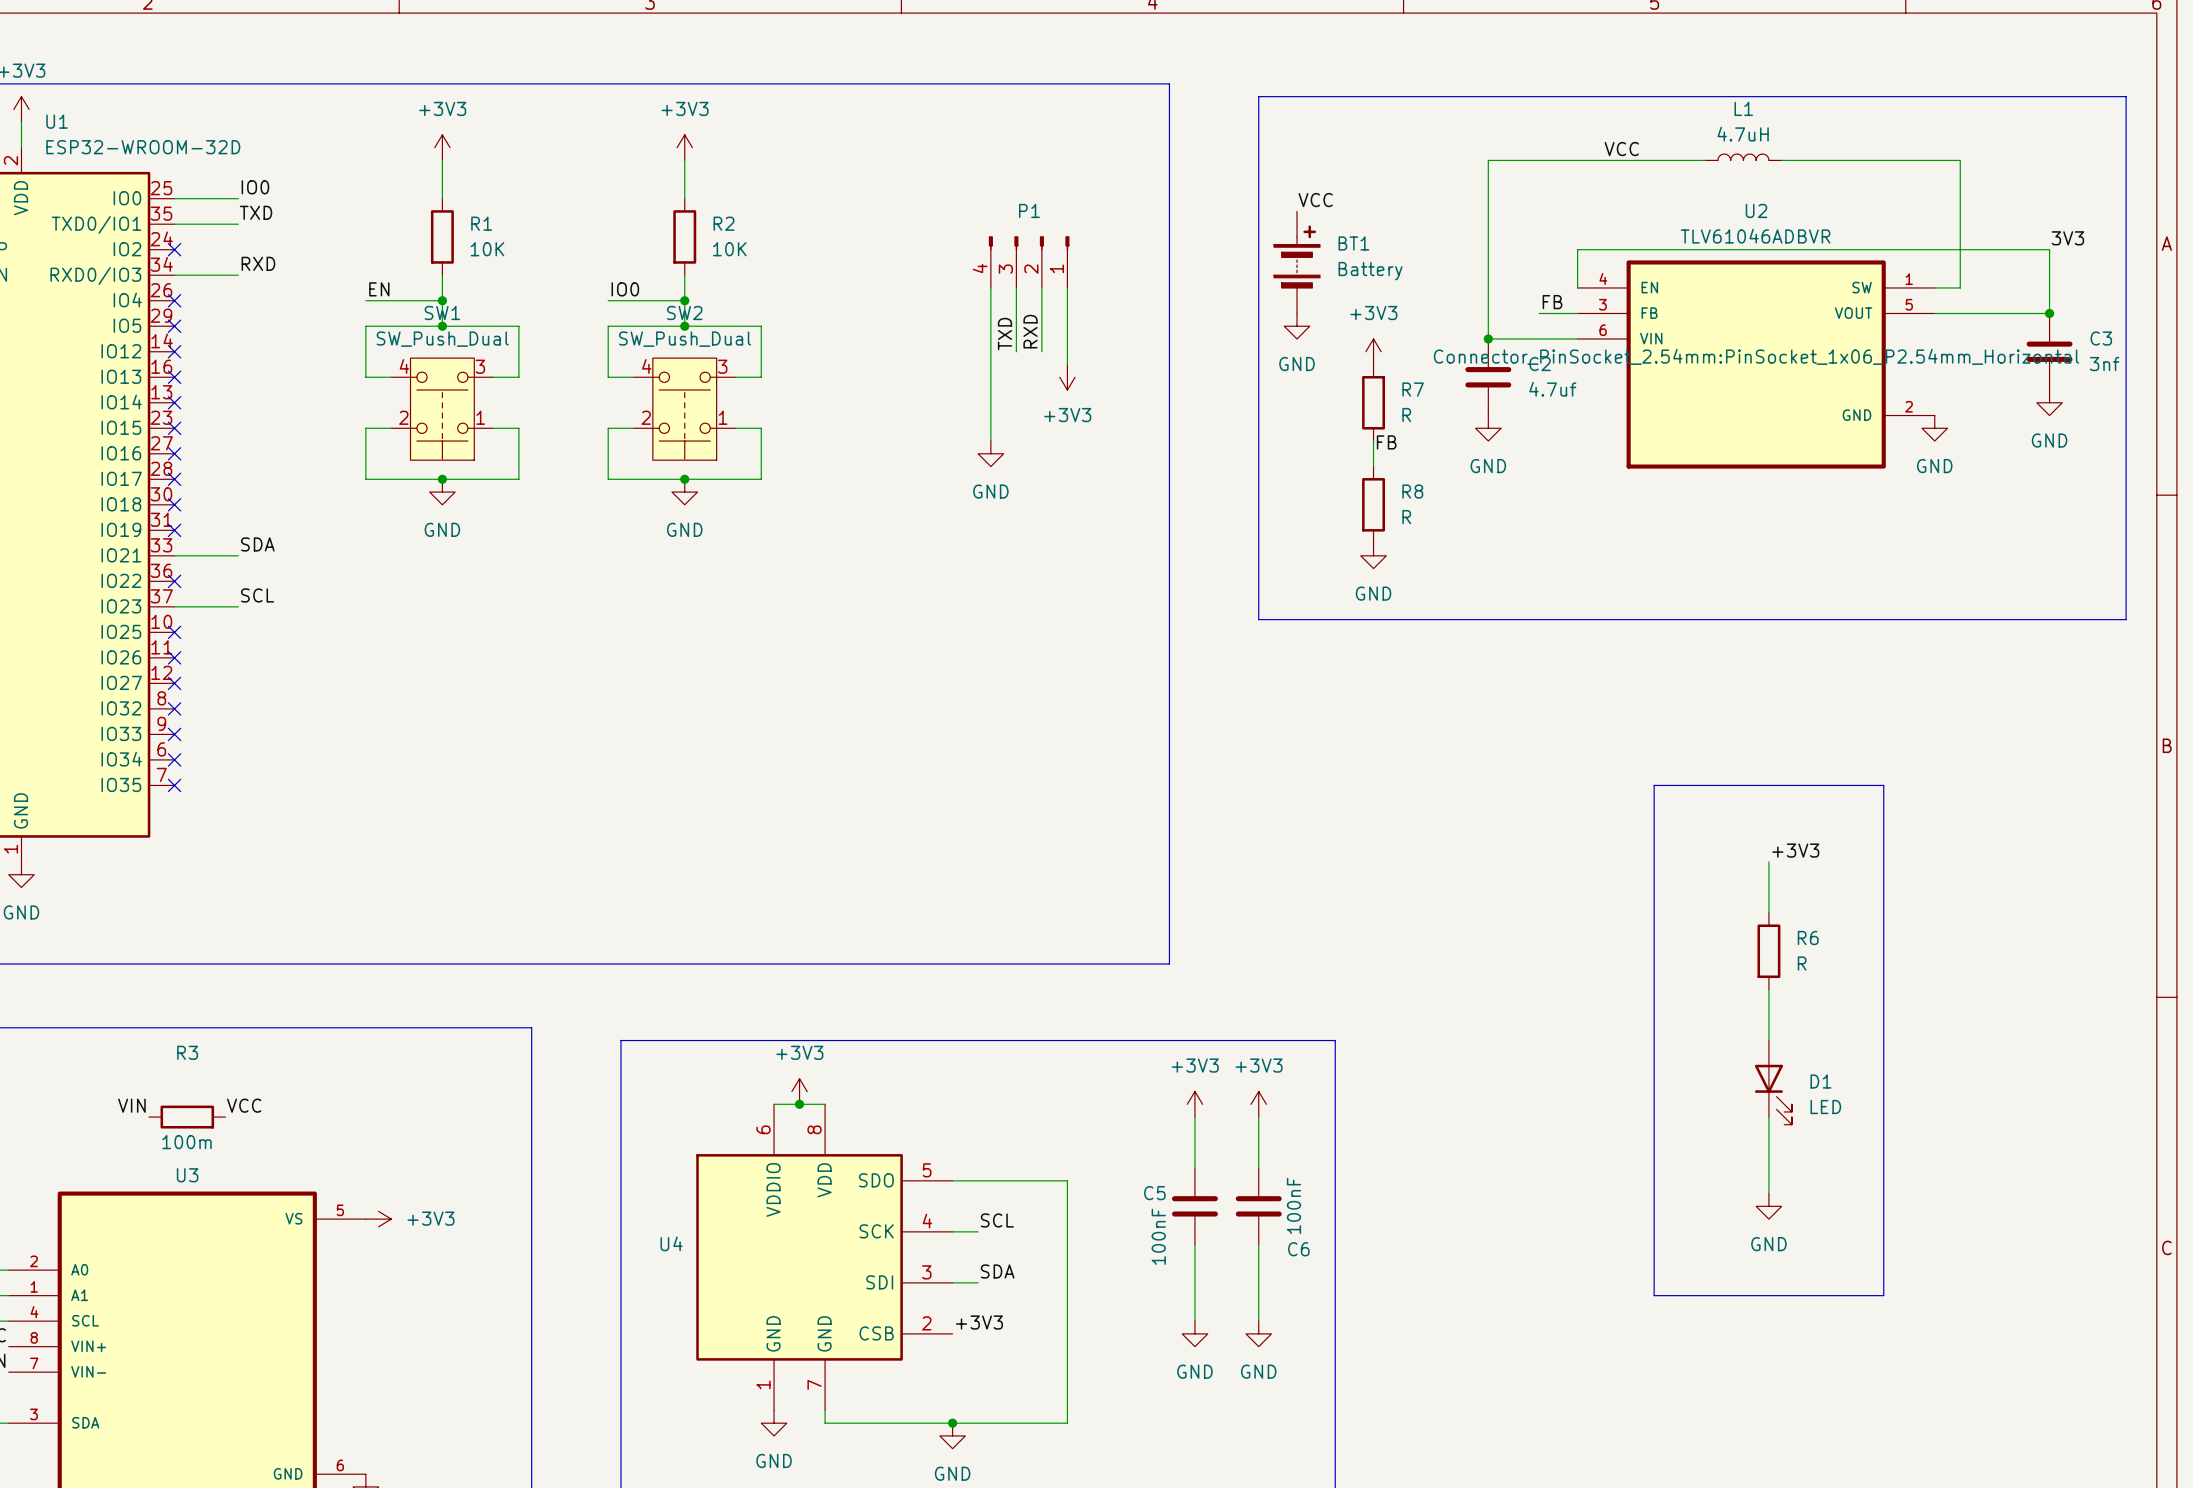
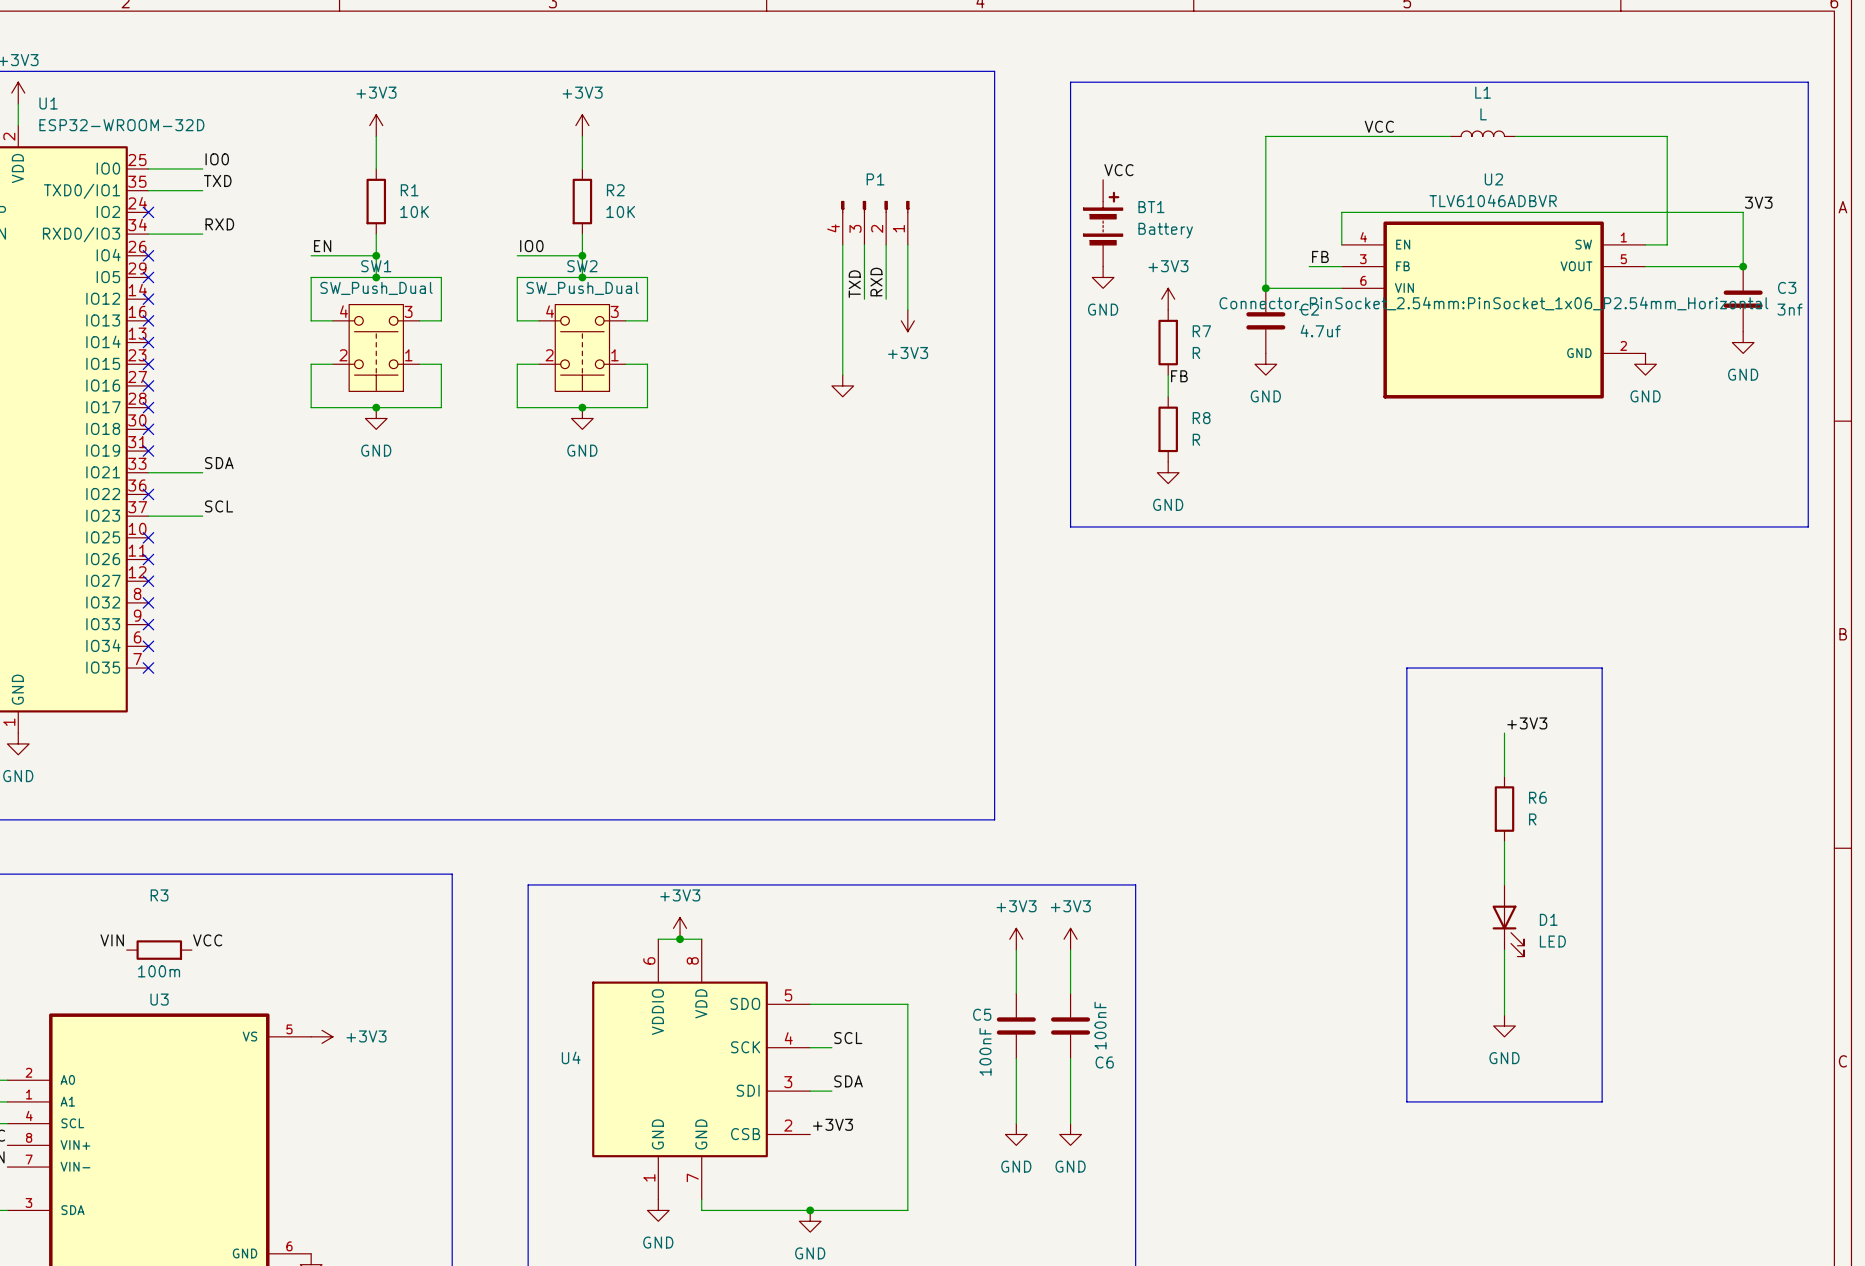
L1 value: 4.7uH (1743, 134) -> L (1483, 114)
power symbol text: GND (990, 491) -> none

